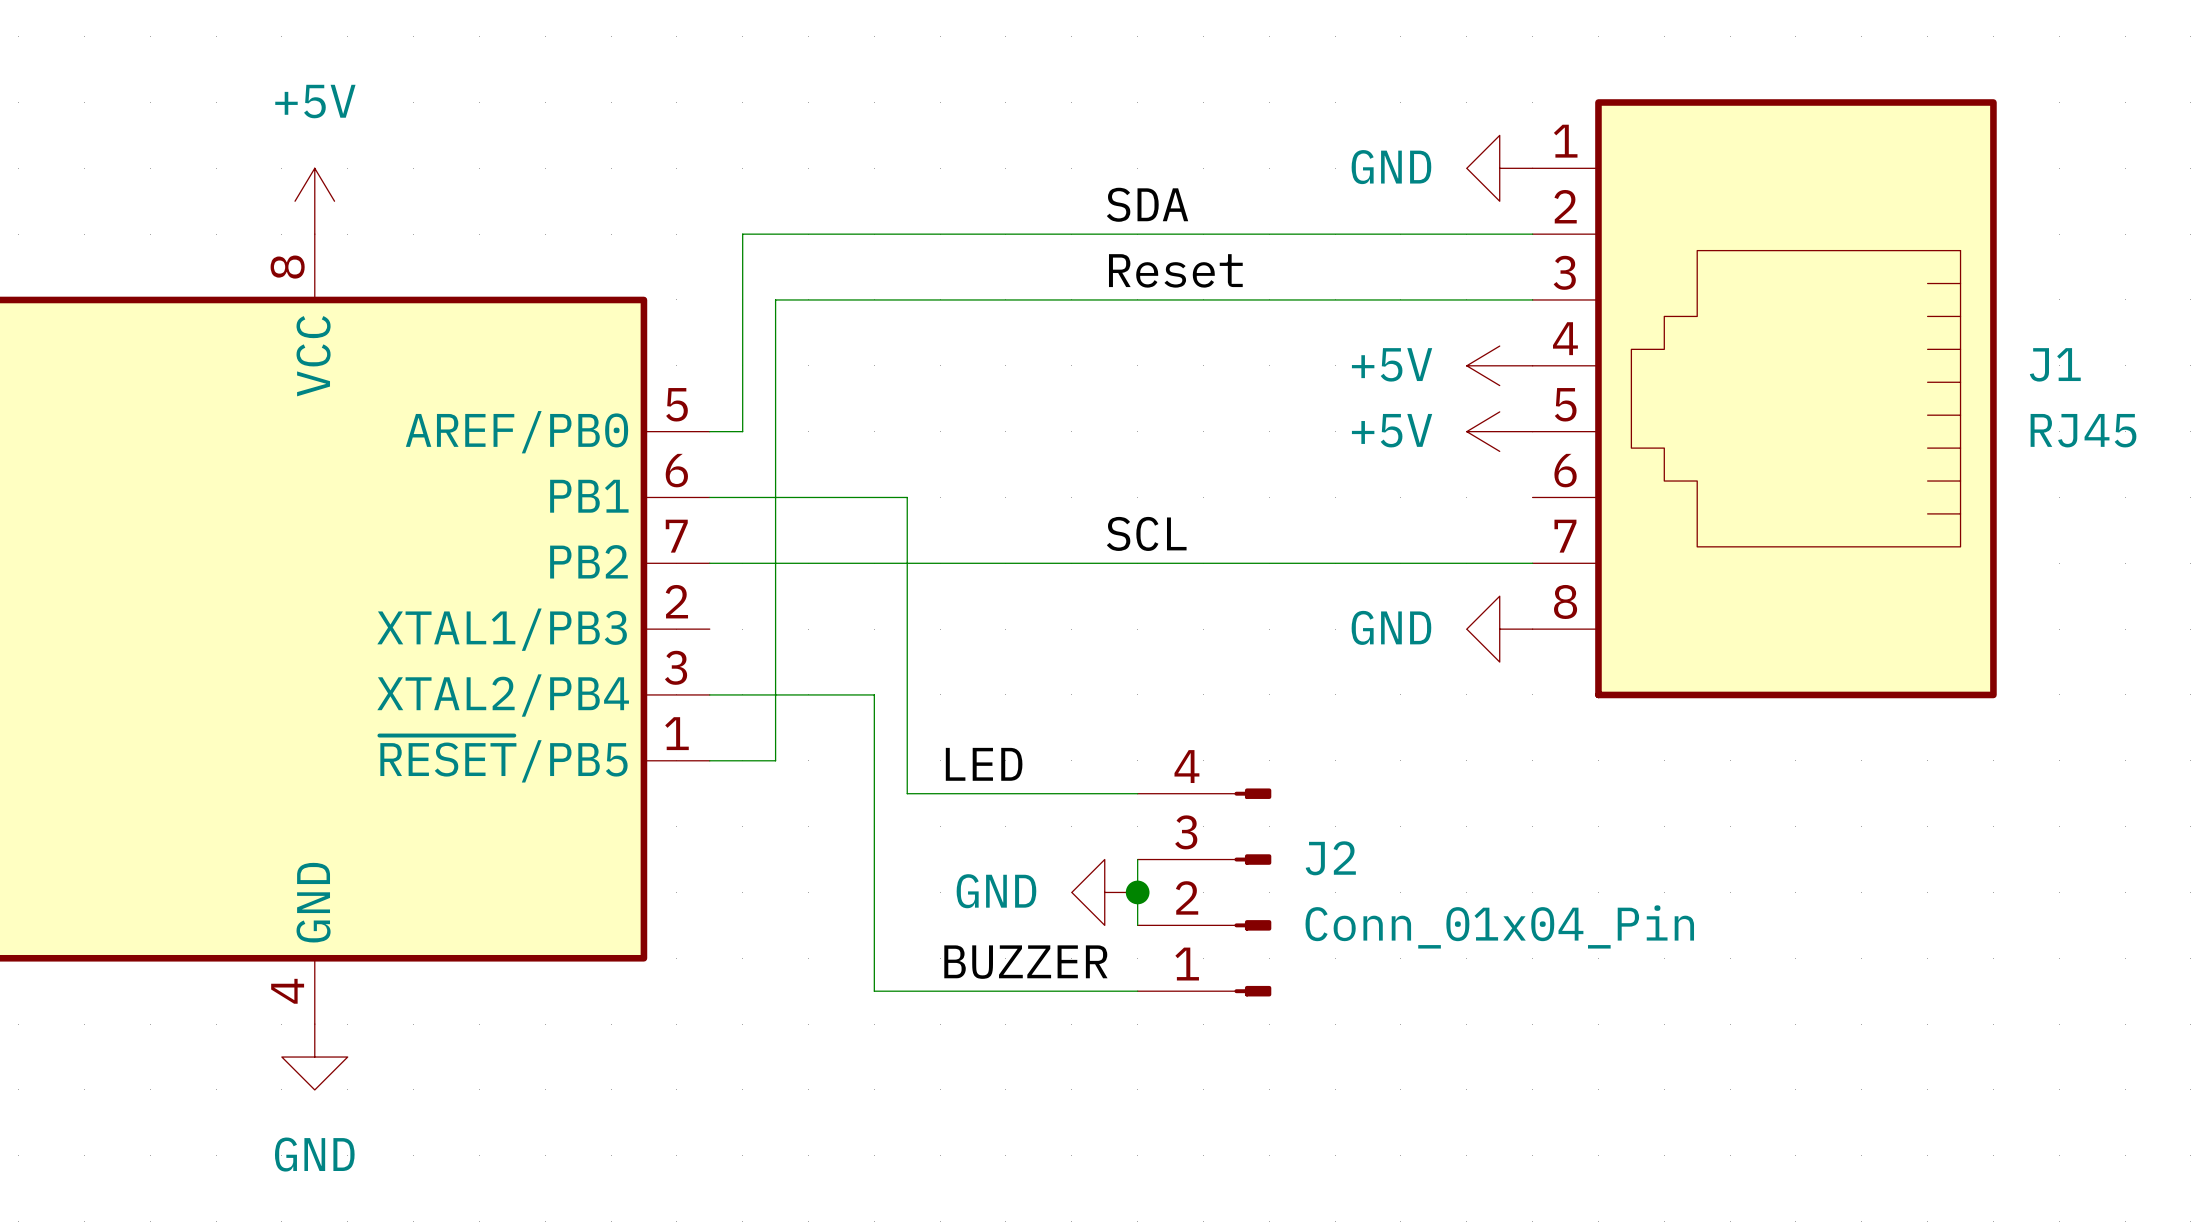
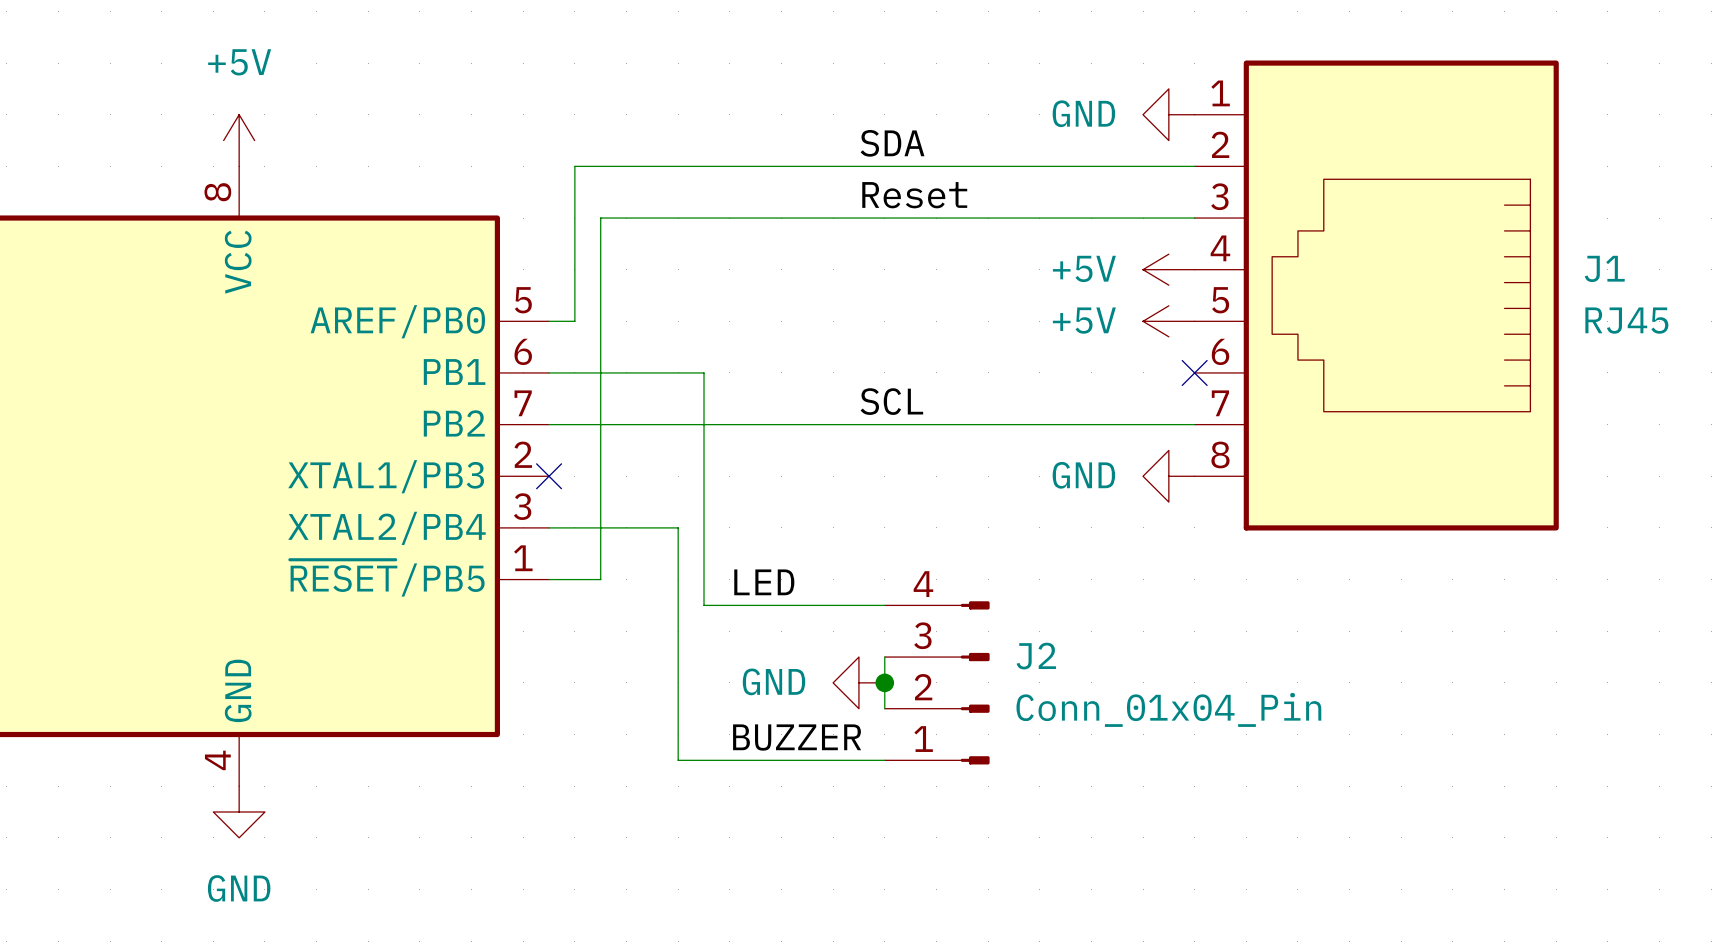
no-connect mark: none -> (1194, 372)
no-connect mark: none -> (549, 476)

